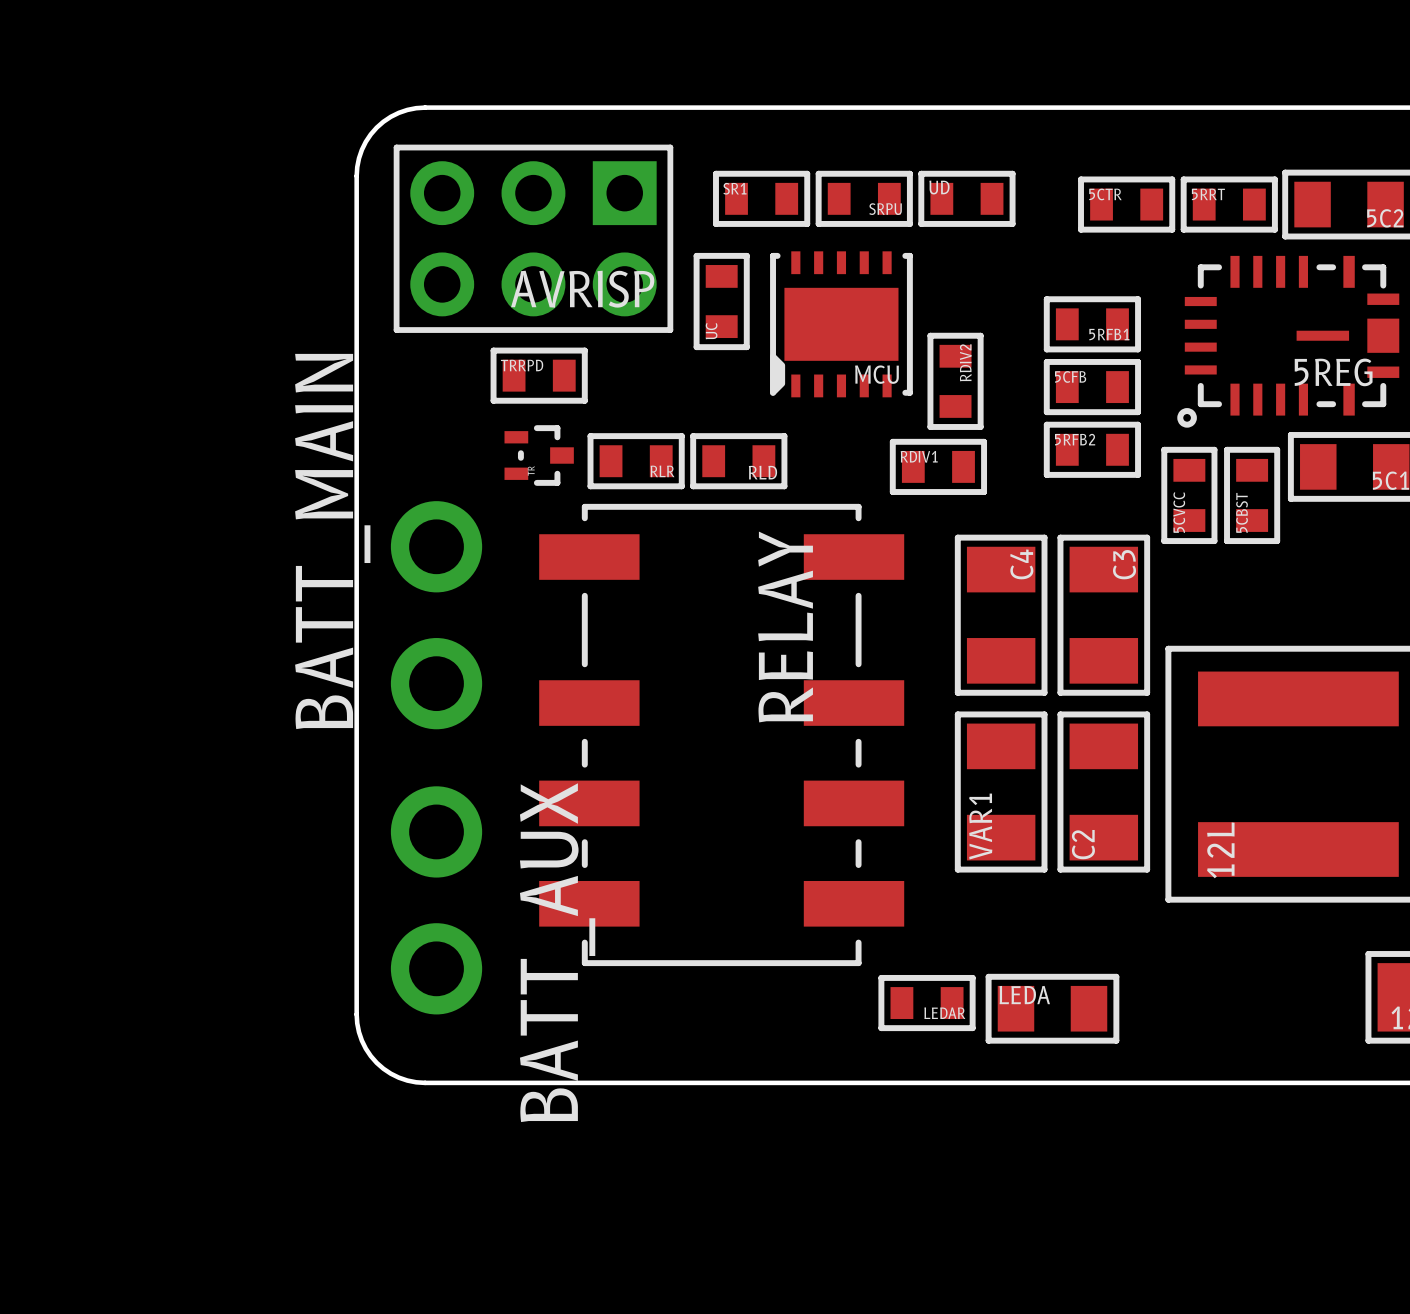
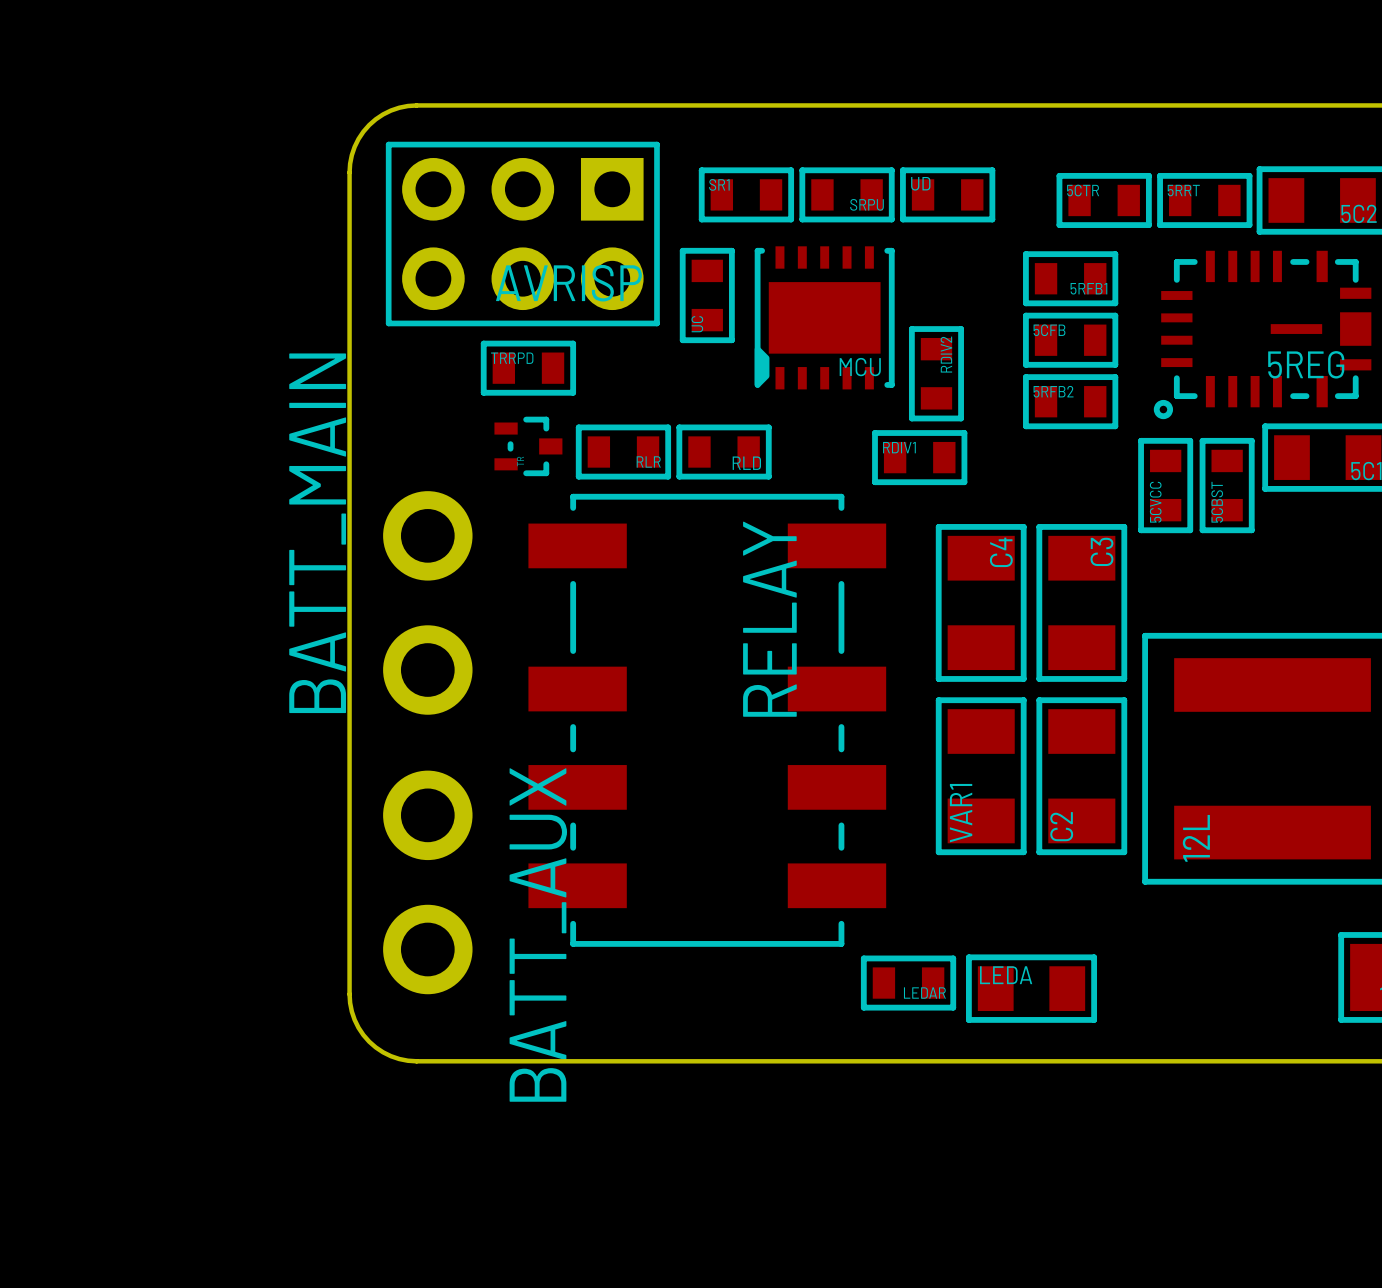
5RFB1 position: (1092, 324) -> (1070, 278)
5CFB position: (1092, 387) -> (1070, 340)
5RFB2 position: (1092, 449) -> (1070, 401)

